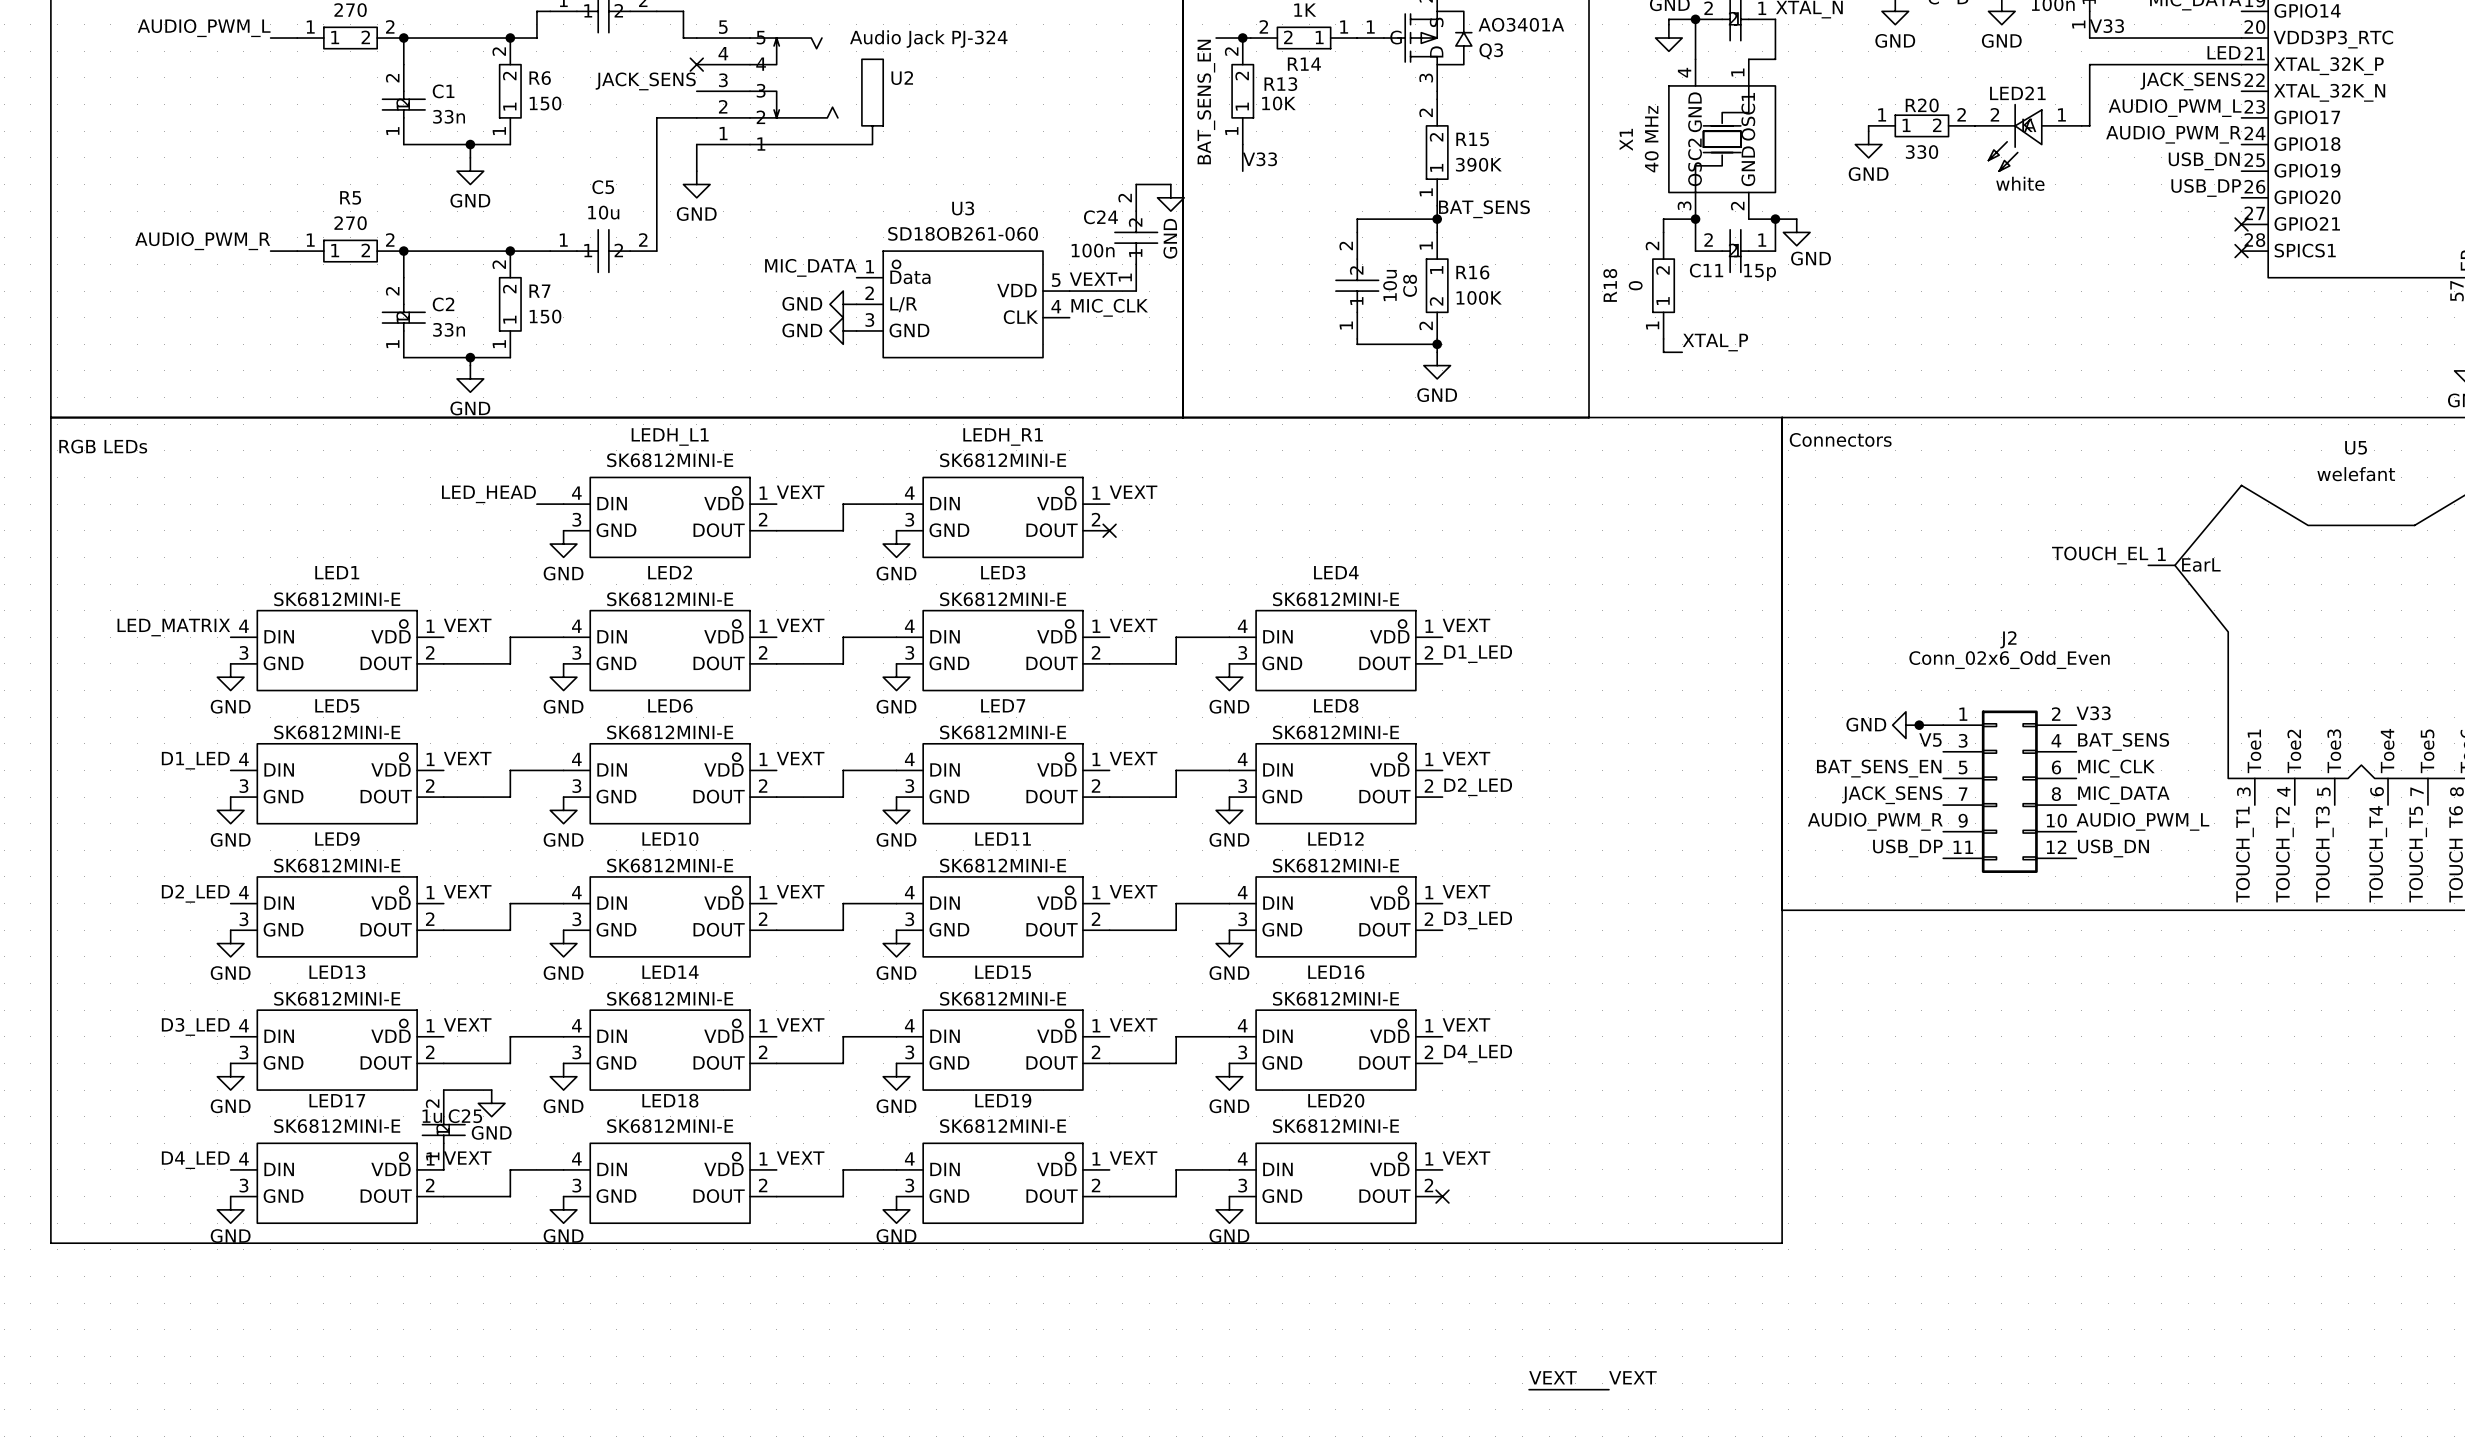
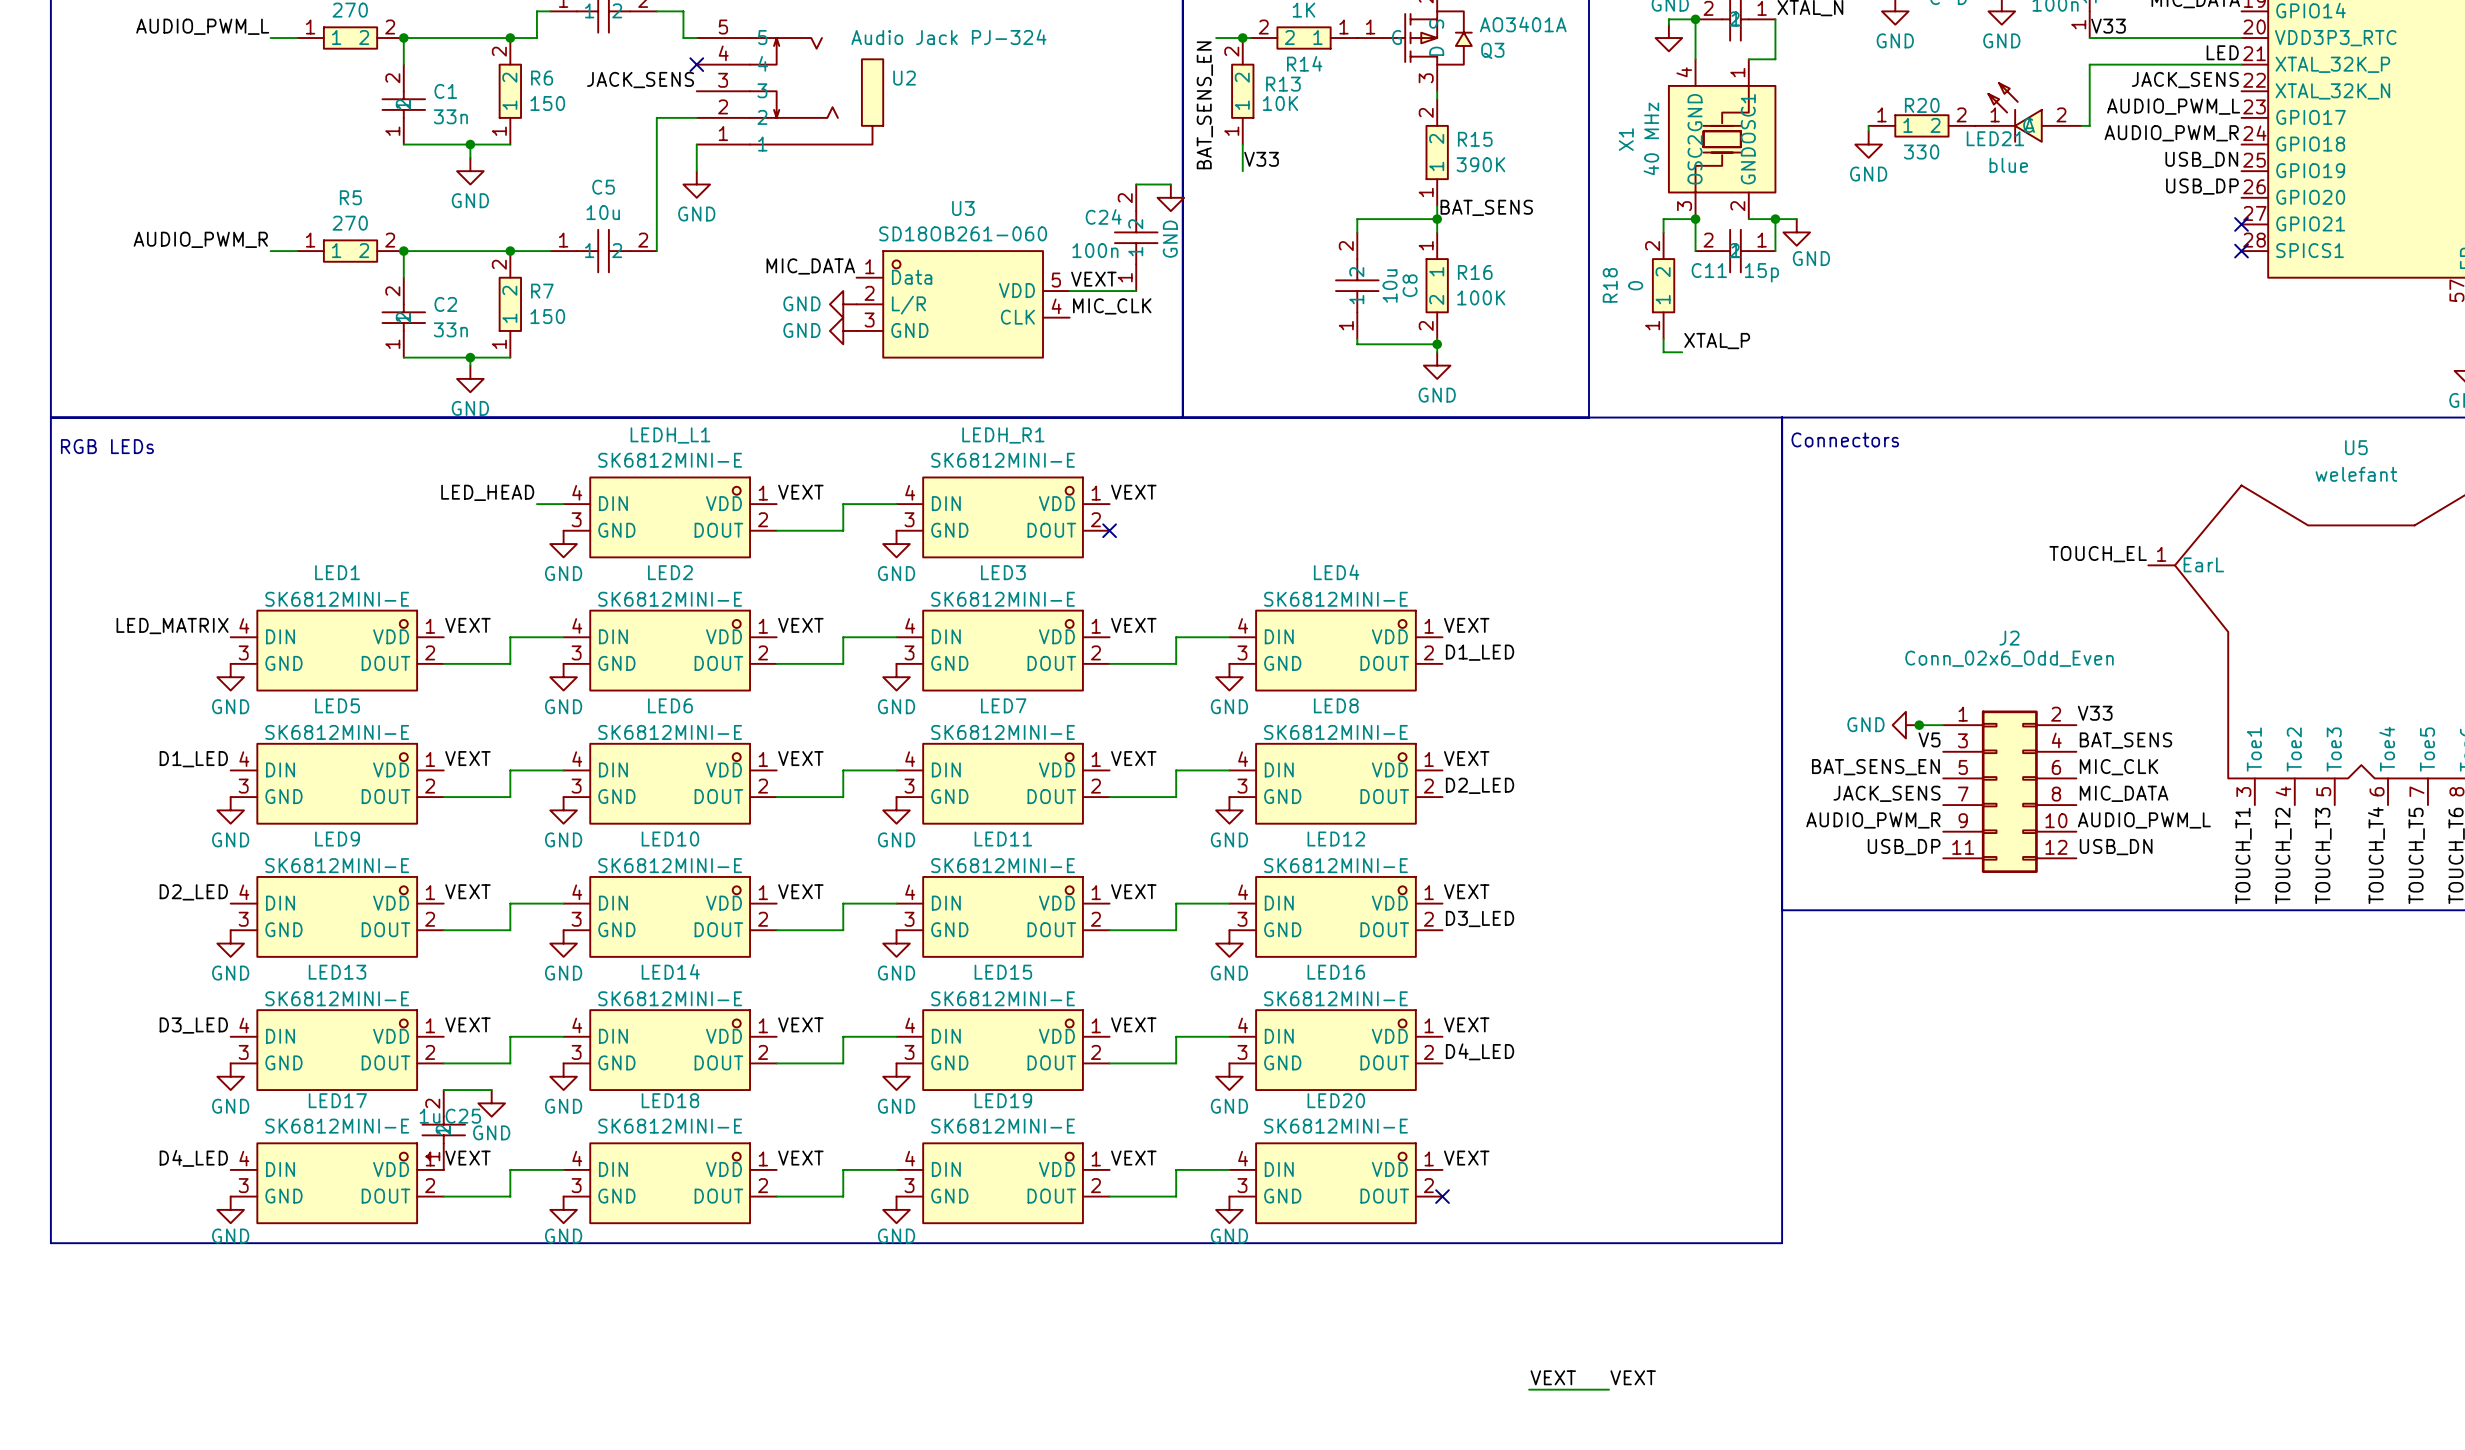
LED21 name position: LED21 (2017, 93) -> LED21 (1995, 138)
LED21 symbol: [1975, 104, 2082, 172] -> [1975, 83, 2082, 142]
LED21 value: white (2020, 183) -> blue (2008, 165)

